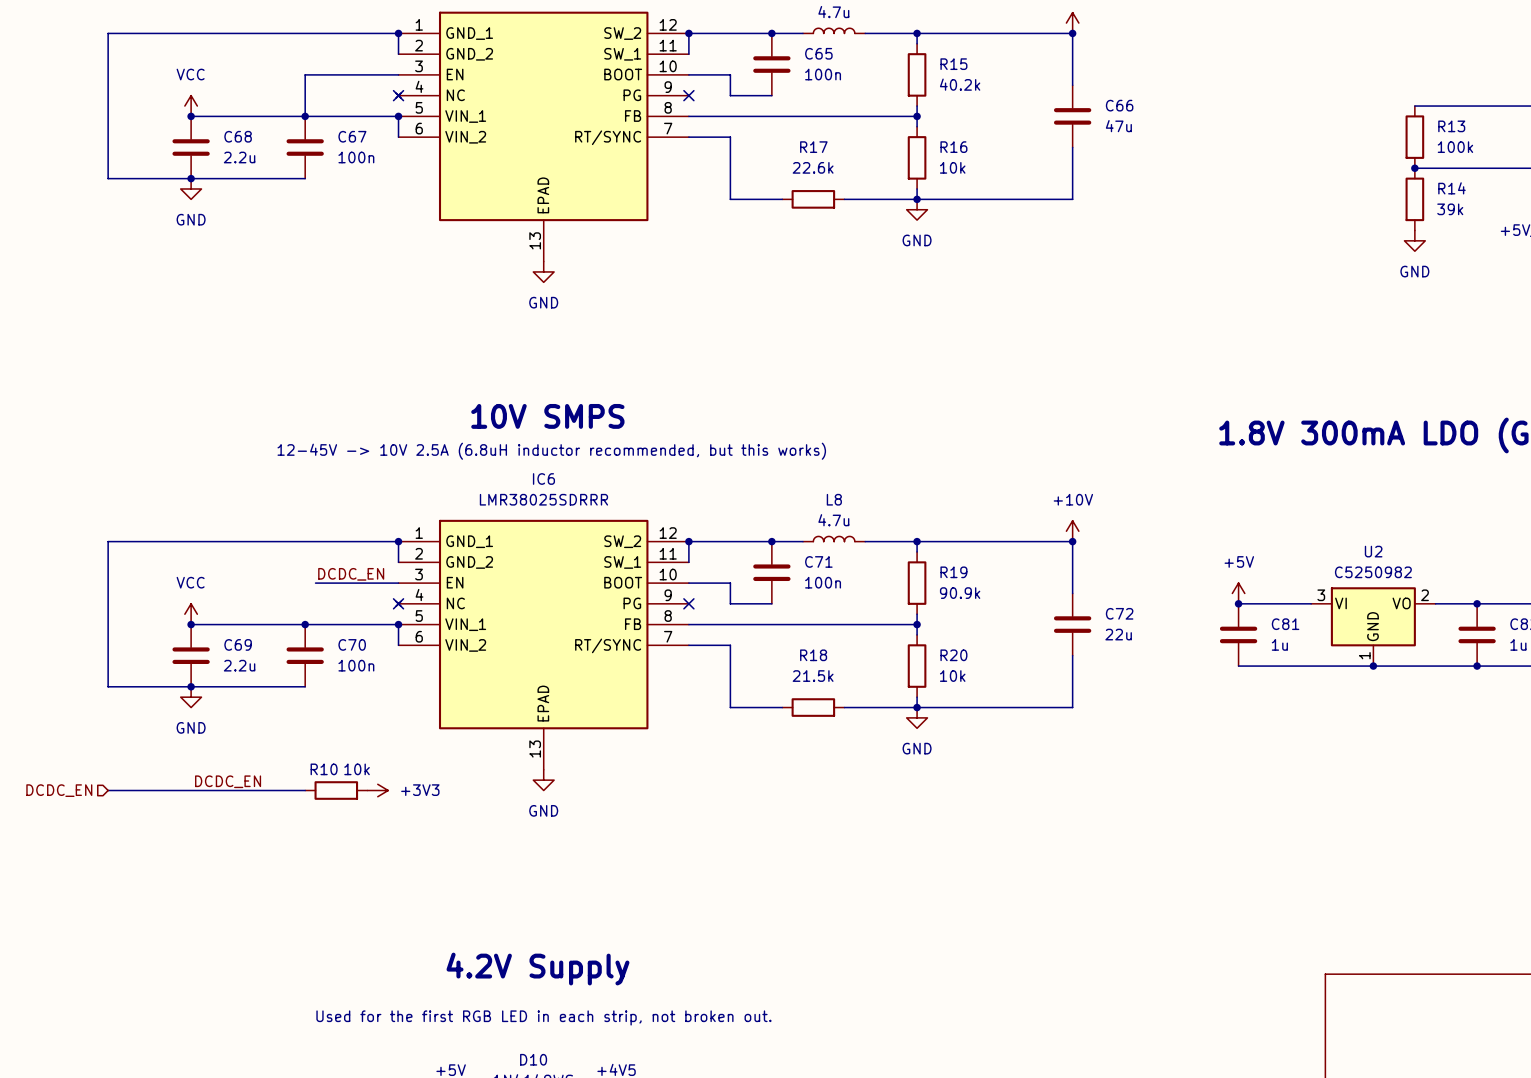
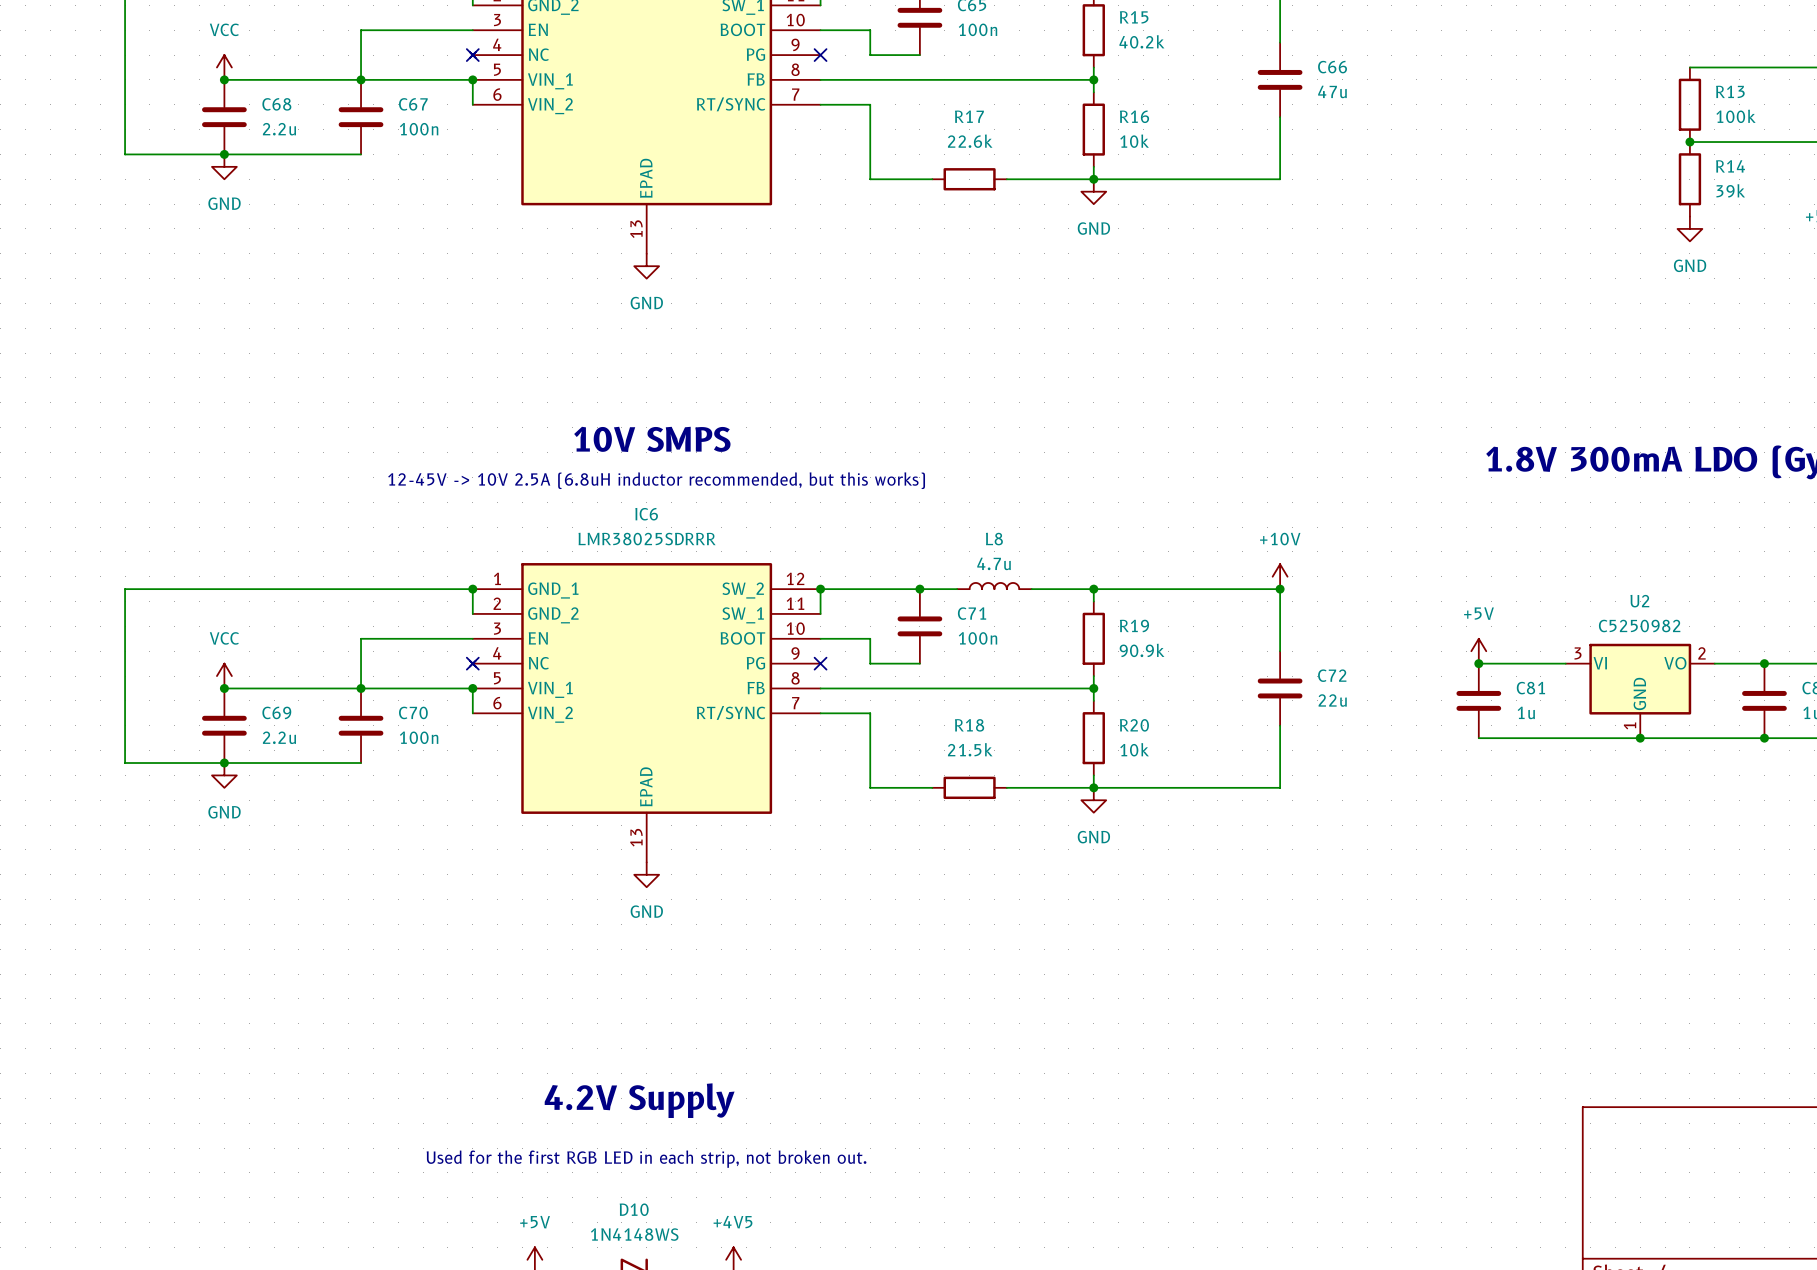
label: DCDC_EN (351, 574) -> none
wire: none -> (373, 638) (361, 638) (361, 688)
label: DCDC_EN (228, 781) -> none
hierarchical label: DCDC_EN (59, 790) -> none
wire: (108, 790) (305, 790) -> none
R10: 10k (336, 790) -> none
power symbol: +3V3 (377, 790) -> none

